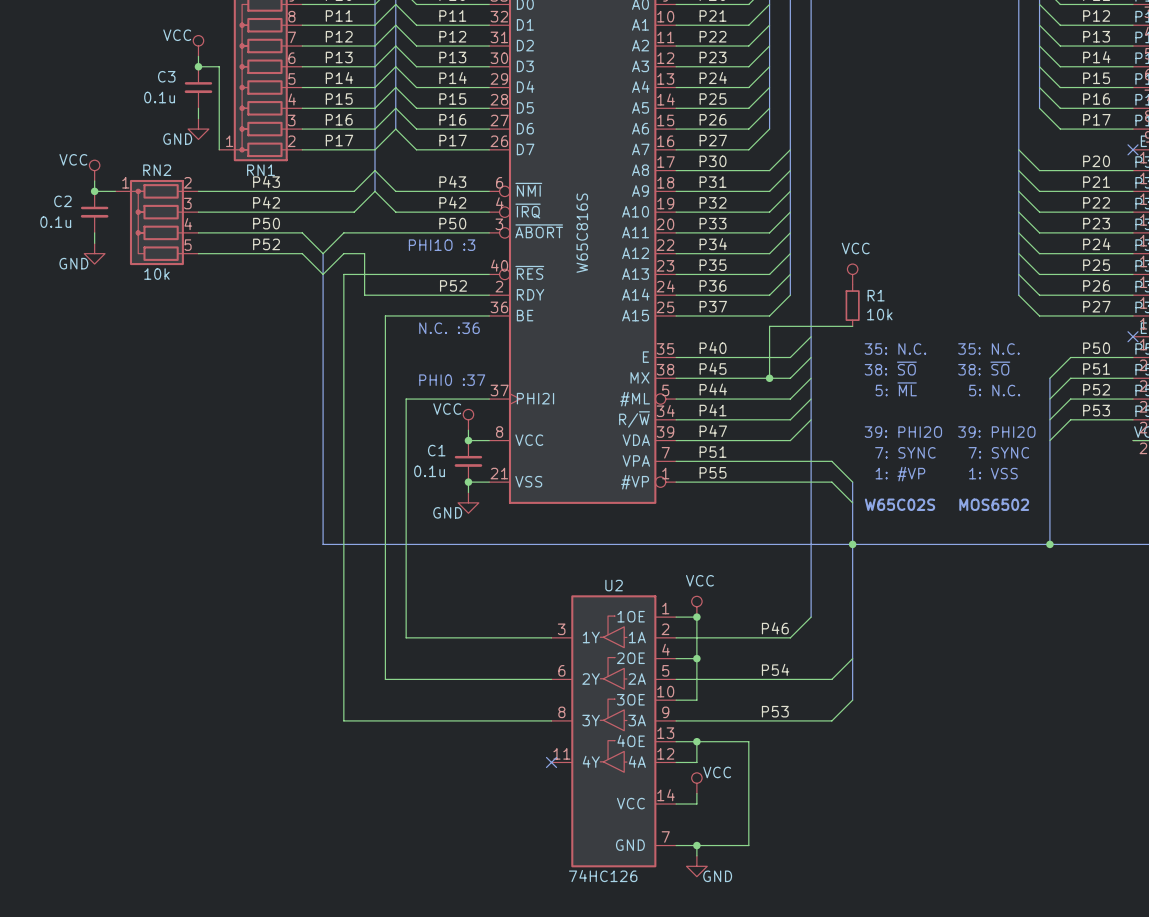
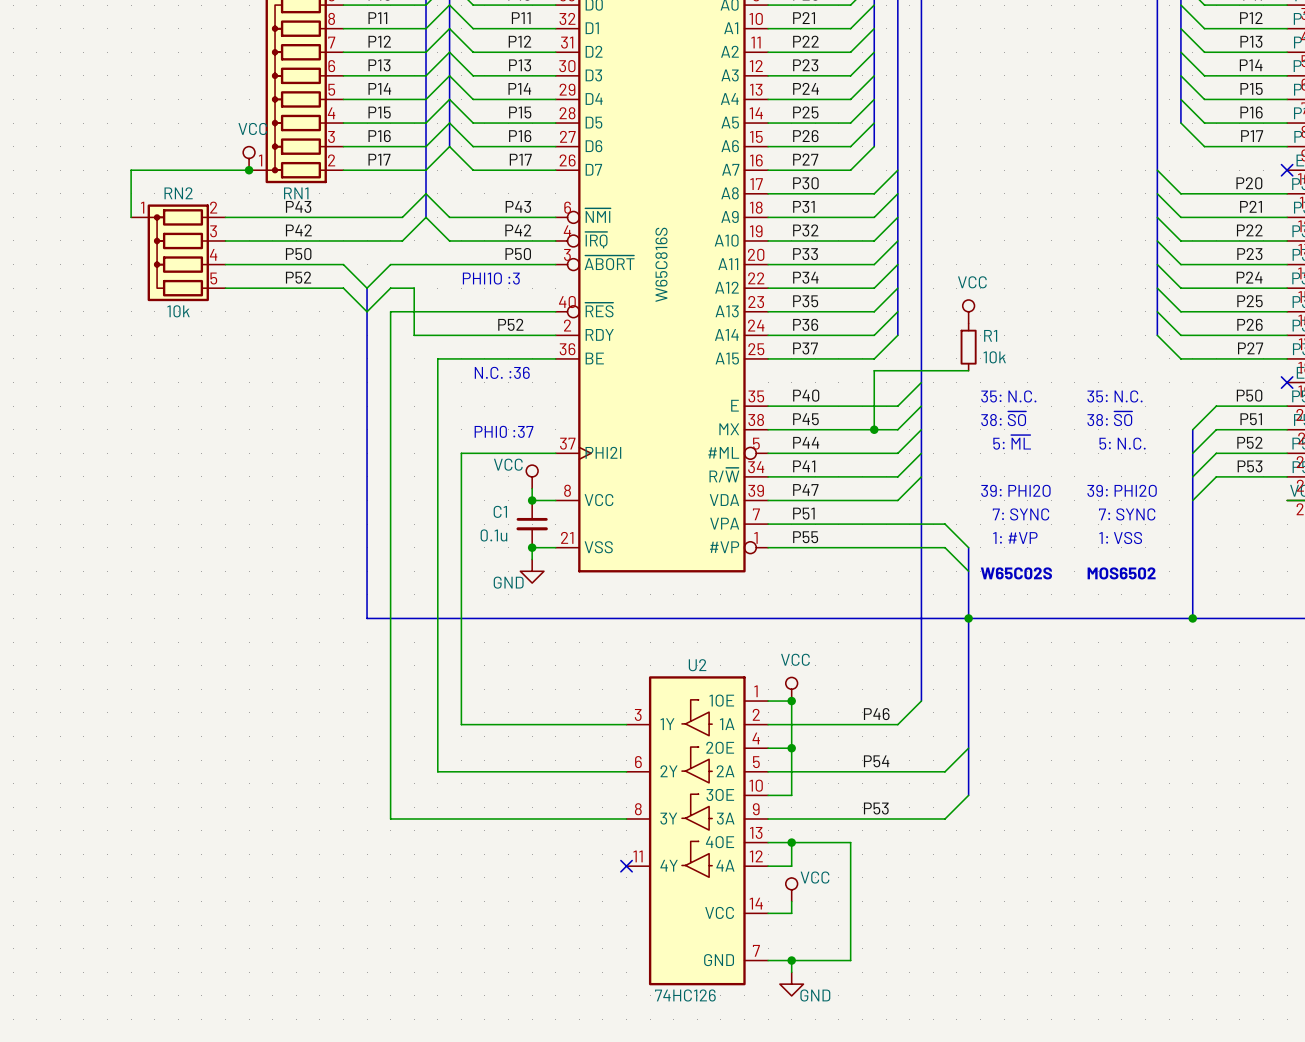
power symbol: VCC (198, 46) -> none
wire: (198, 56) (198, 66) (219, 66) (219, 149) -> none
junction: (198, 66) -> none
C3: 0.1u (198, 87) -> none
wire: (198, 108) (198, 118) -> none
power symbol: GND (198, 129) -> none
power symbol: none -> VCC (249, 158)
junction: none -> (249, 170)
power symbol: VCC (94, 170) -> none
wire: (94, 180) (94, 191) (115, 191) -> (249, 170) (131, 170) (131, 217)
junction: (94, 191) -> none
C2: 0.1u (94, 212) -> none
wire: (94, 232) (94, 243) -> none
power symbol: GND (94, 253) -> none

